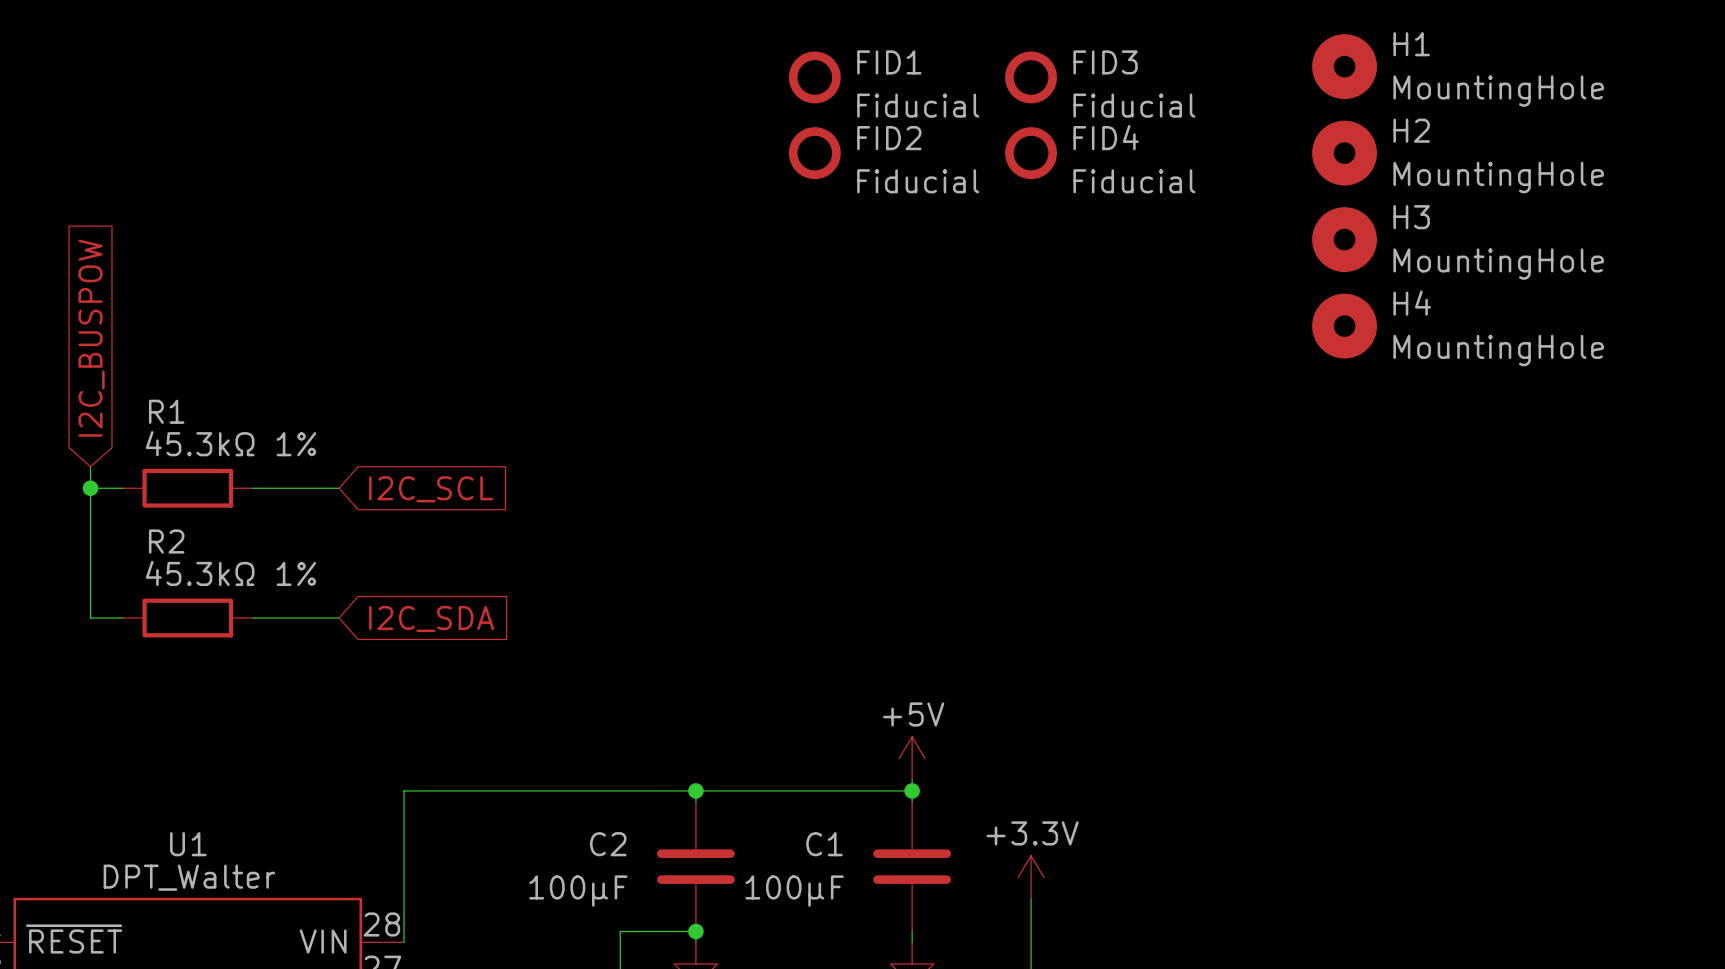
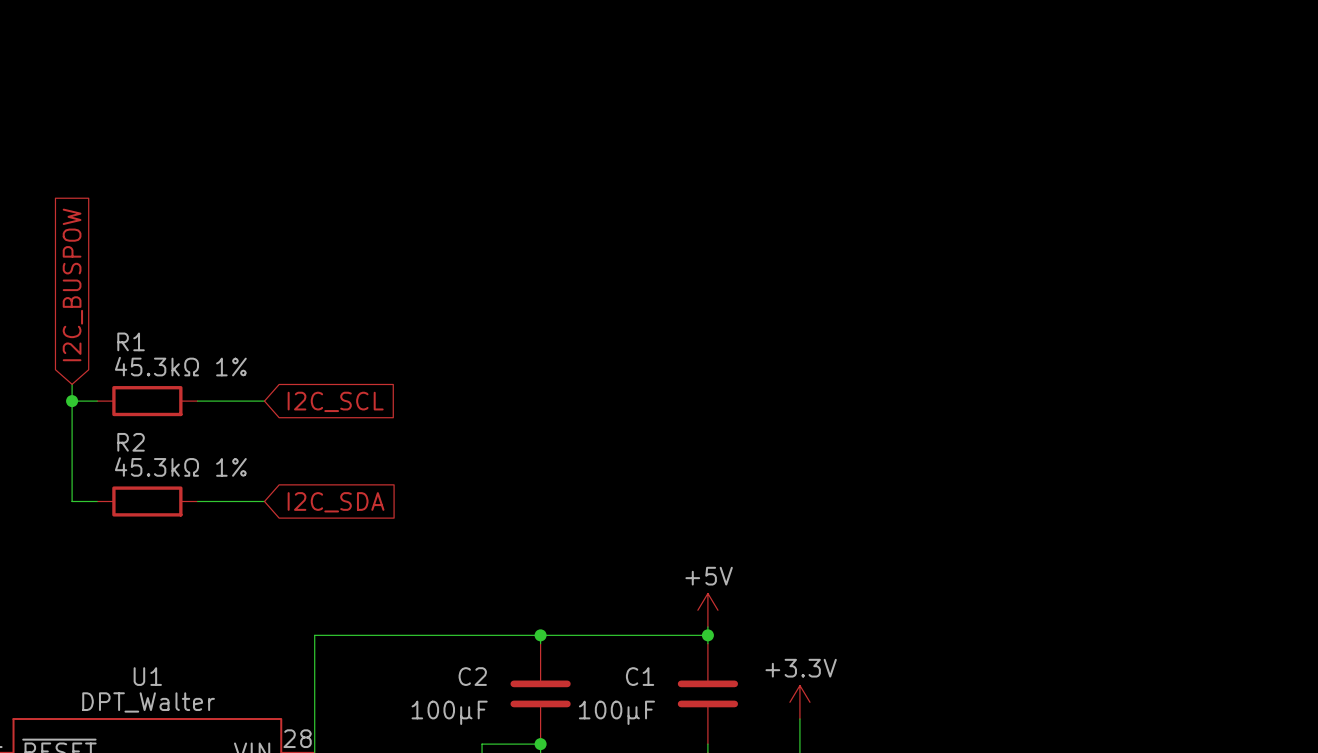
H1: MountingHole (1344, 66) -> none
FID1: Fiducial (814, 77) -> none
FID3: Fiducial (1031, 77) -> none
FID2: Fiducial (814, 153) -> none
FID4: Fiducial (1031, 153) -> none
H2: MountingHole (1344, 153) -> none
H3: MountingHole (1344, 239) -> none
H4: MountingHole (1344, 326) -> none

